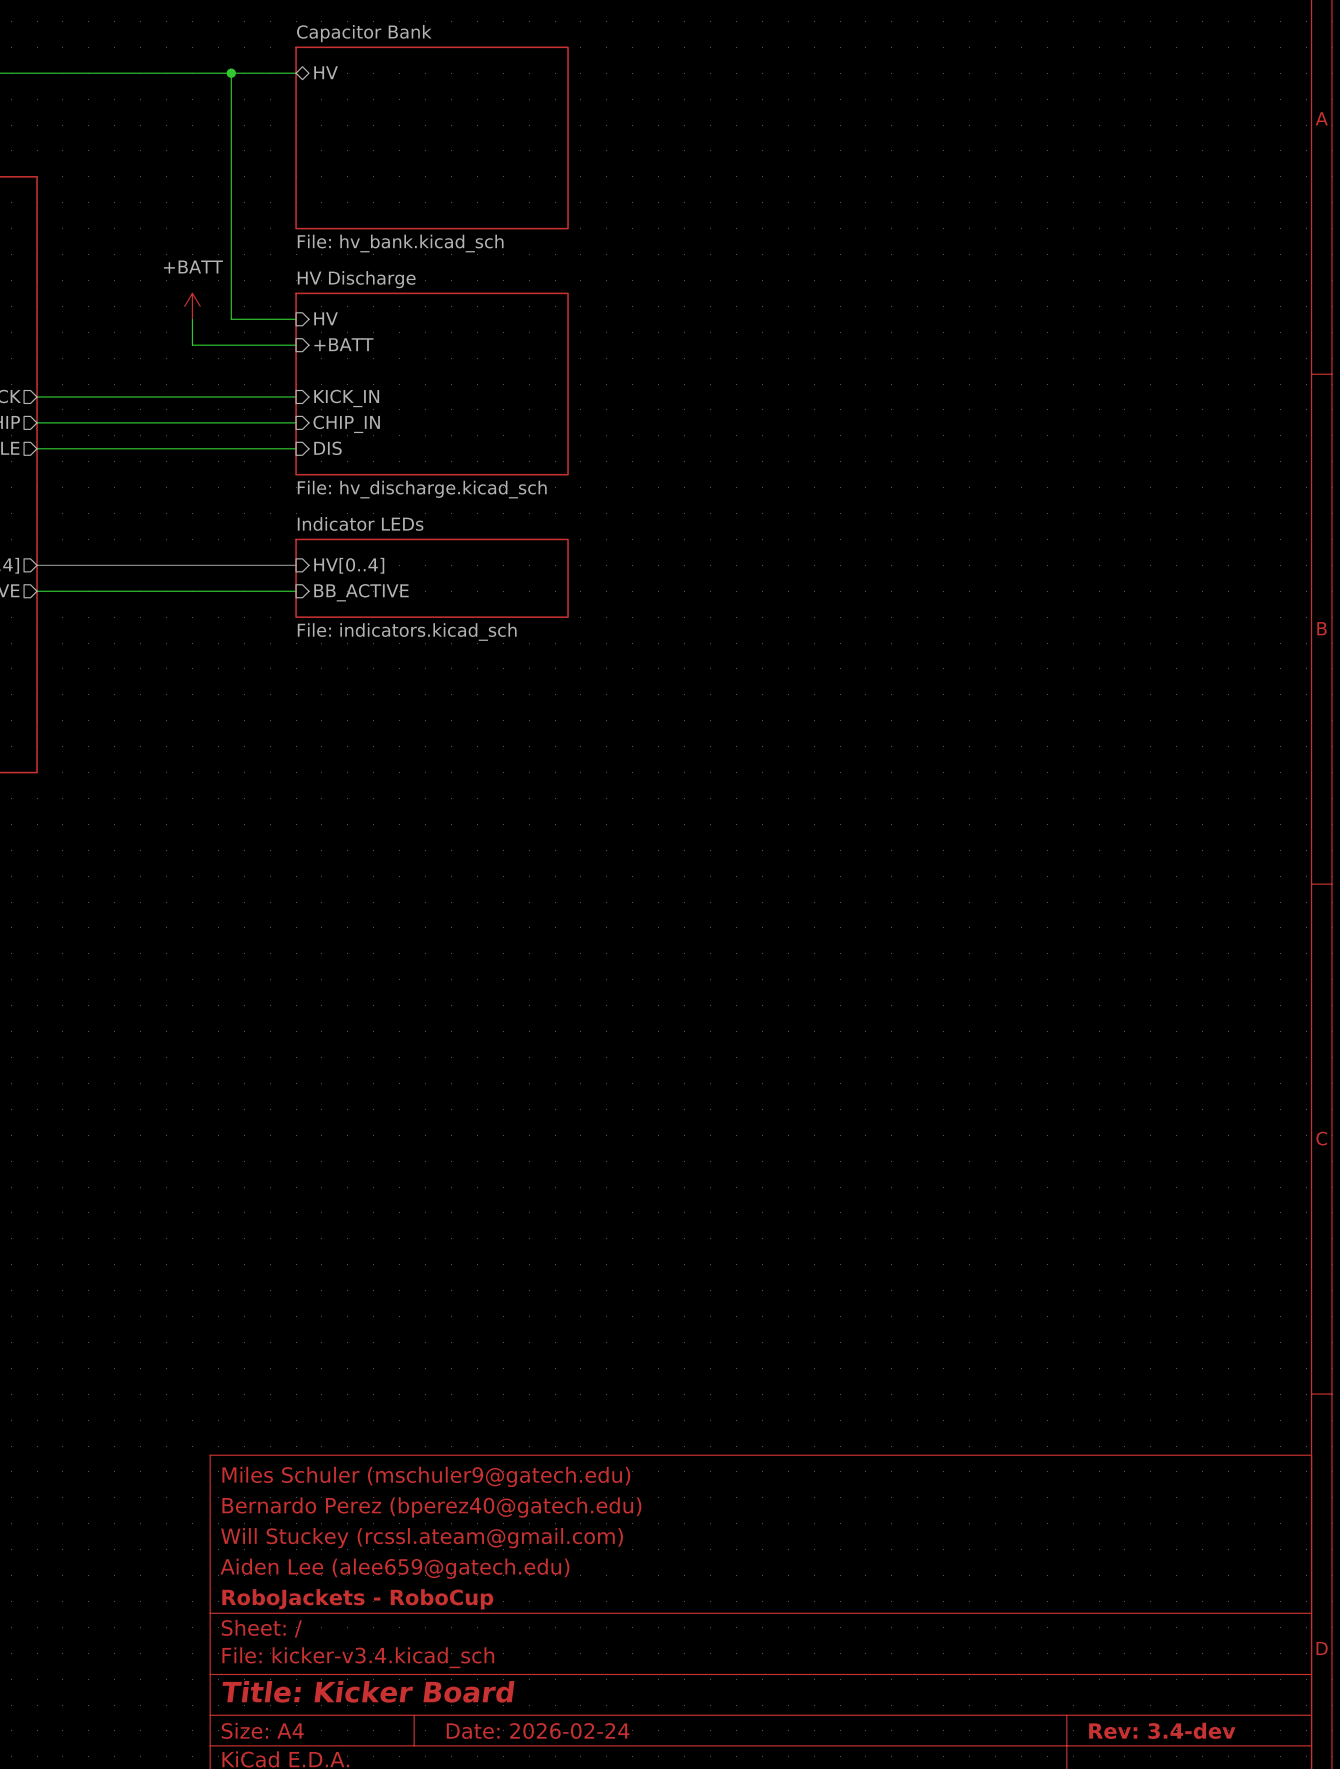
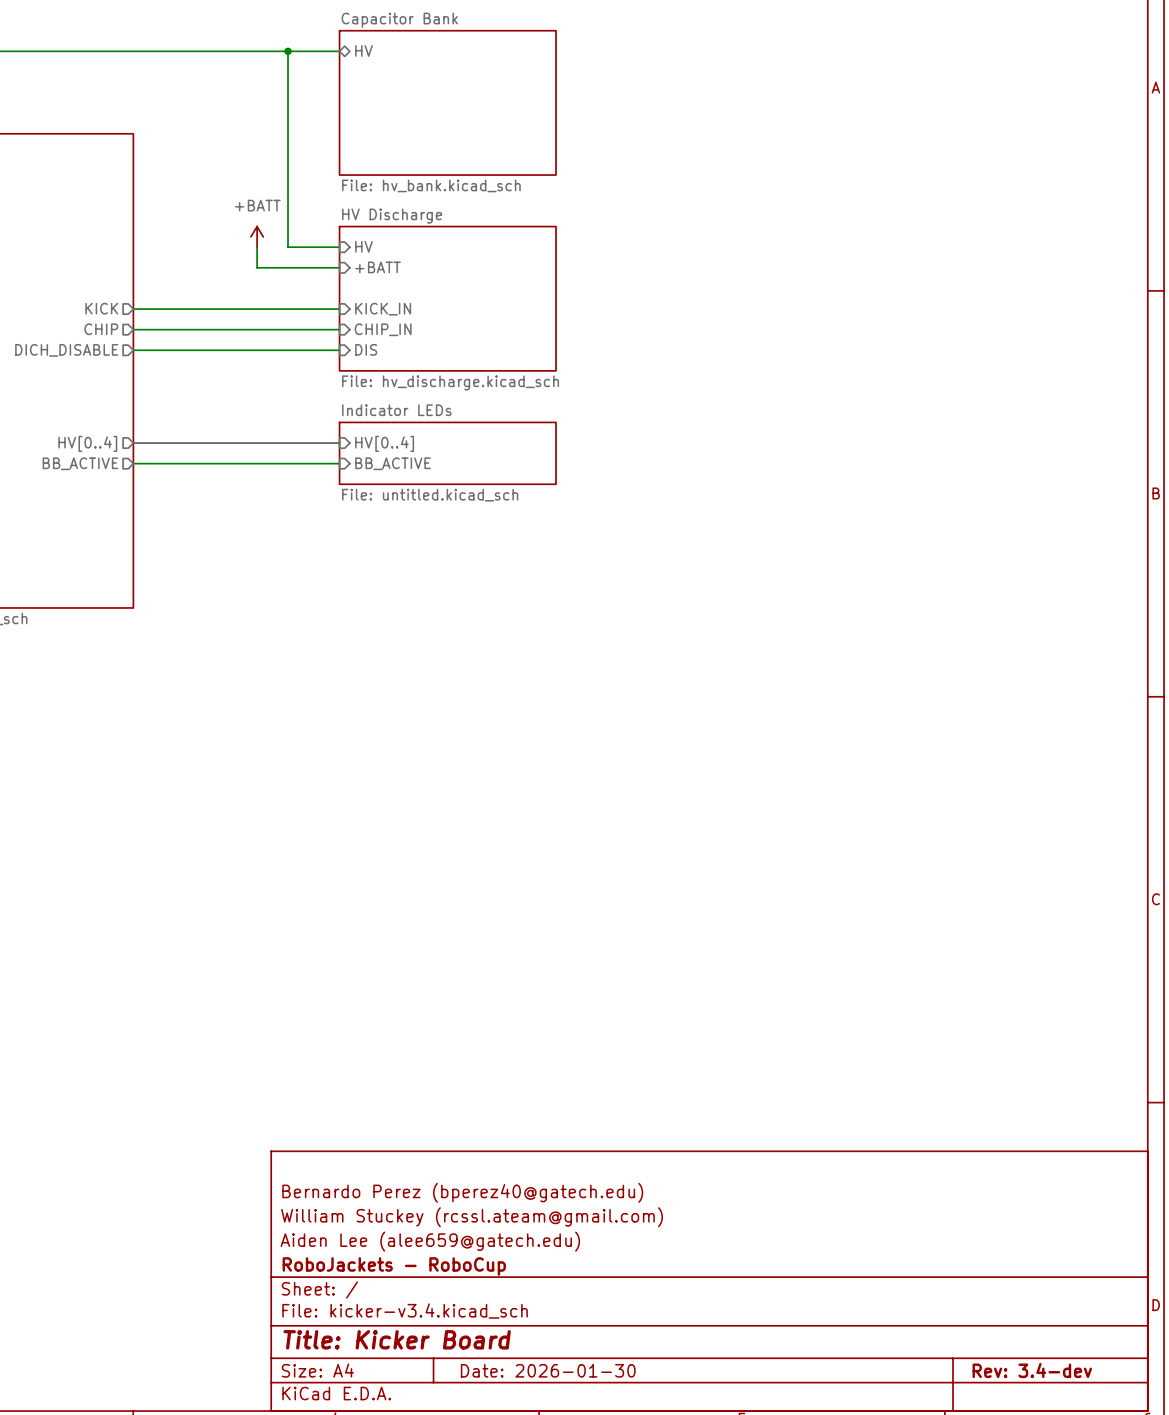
sheet Indicator LEDs value: File: indicators.kicad_sch (407, 632) -> File: untitled.kicad_sch (430, 495)
title block: Miles Schuler (mschuler9@gatech.edu) (426, 1476) -> none
title block: Will Stuckey (rcssl.ateam@gmail.com) (422, 1538) -> William Stuckey (rcssl.ateam@gmail.com) (472, 1217)
title block: Date: 2026-02-24 (538, 1731) -> Date: 2026-01-30 (548, 1370)

